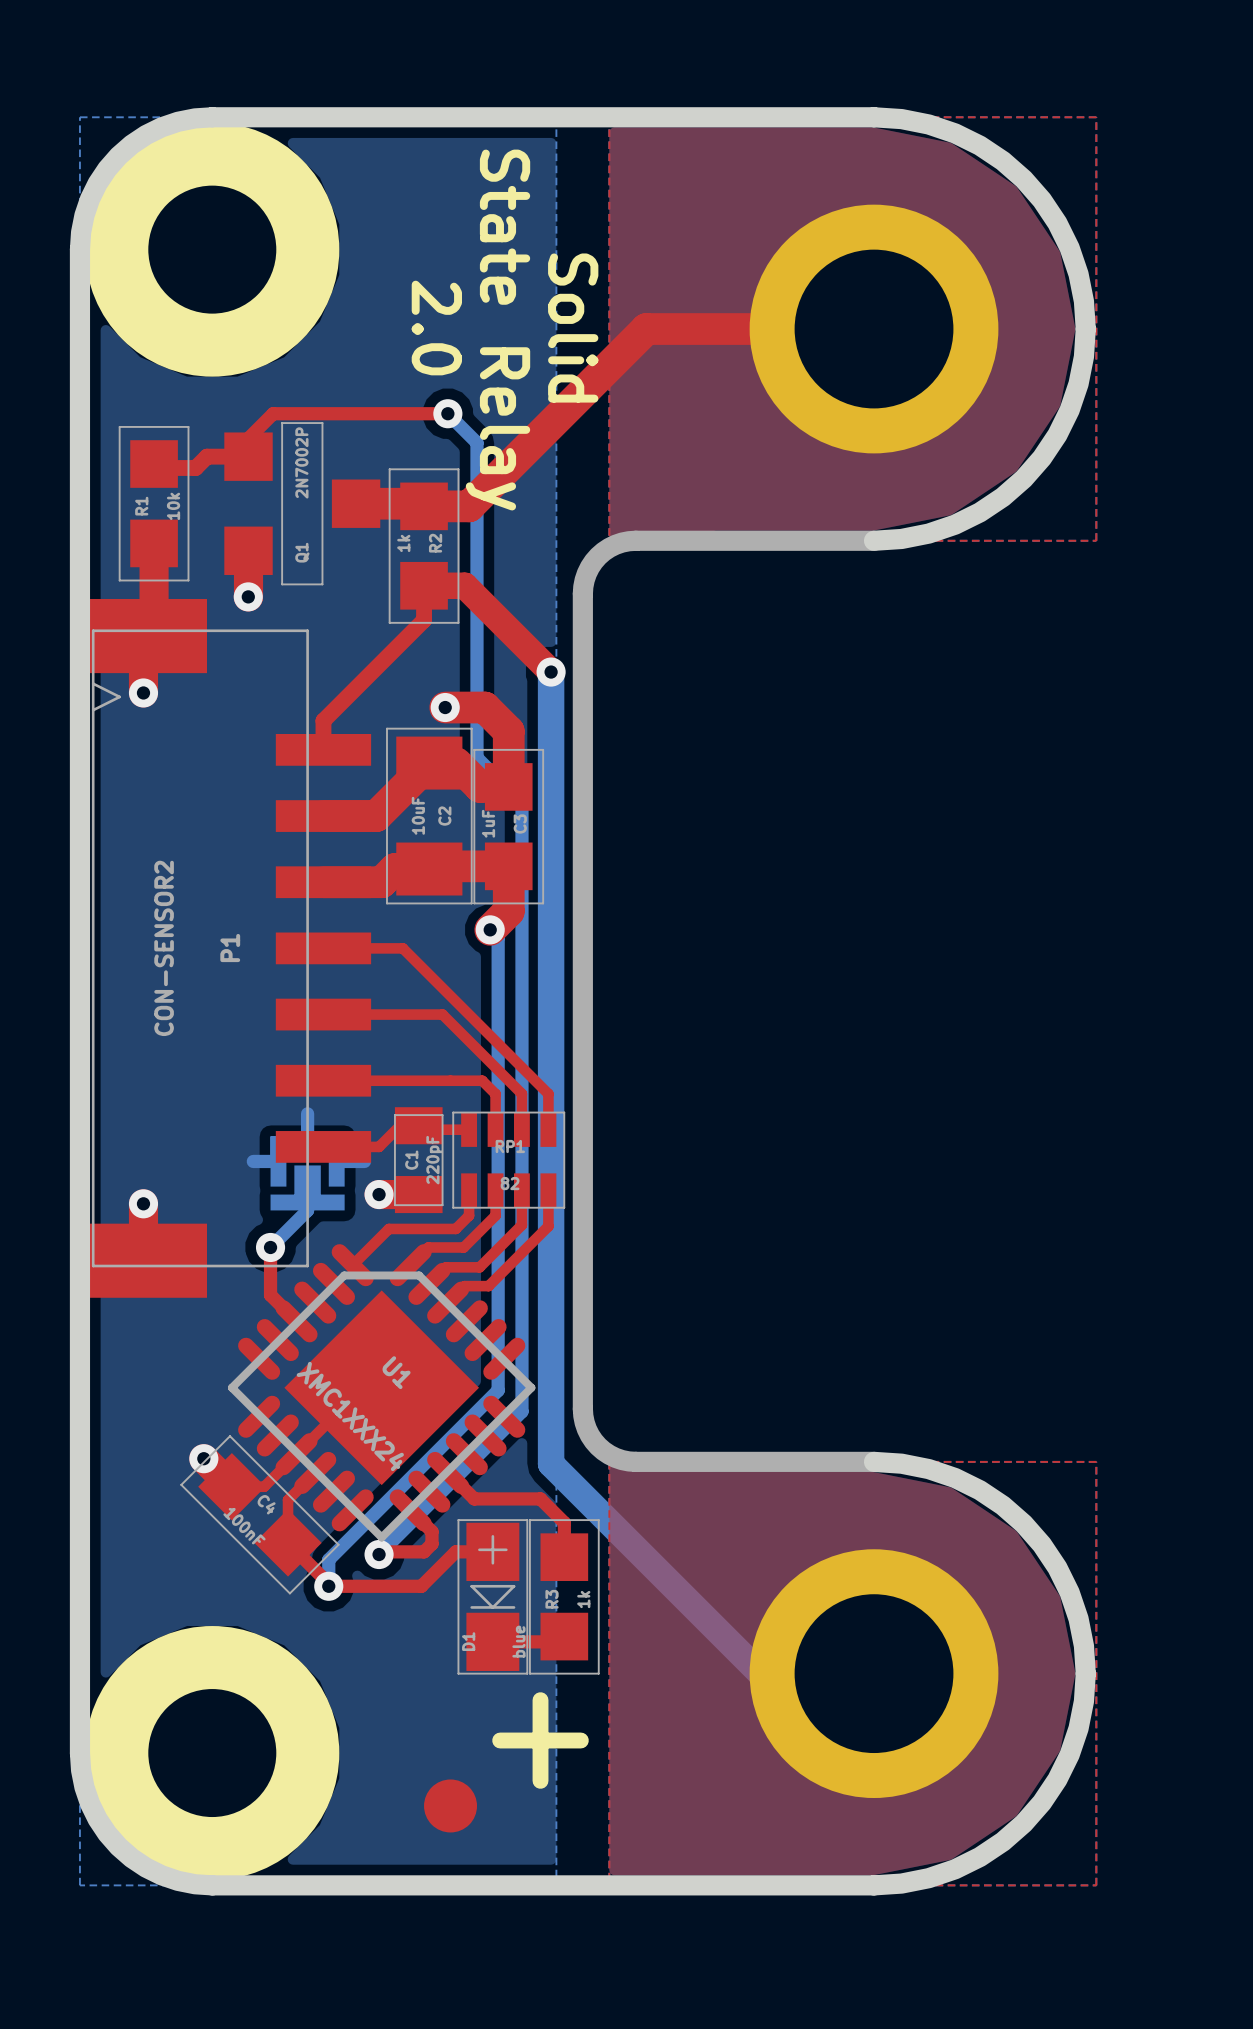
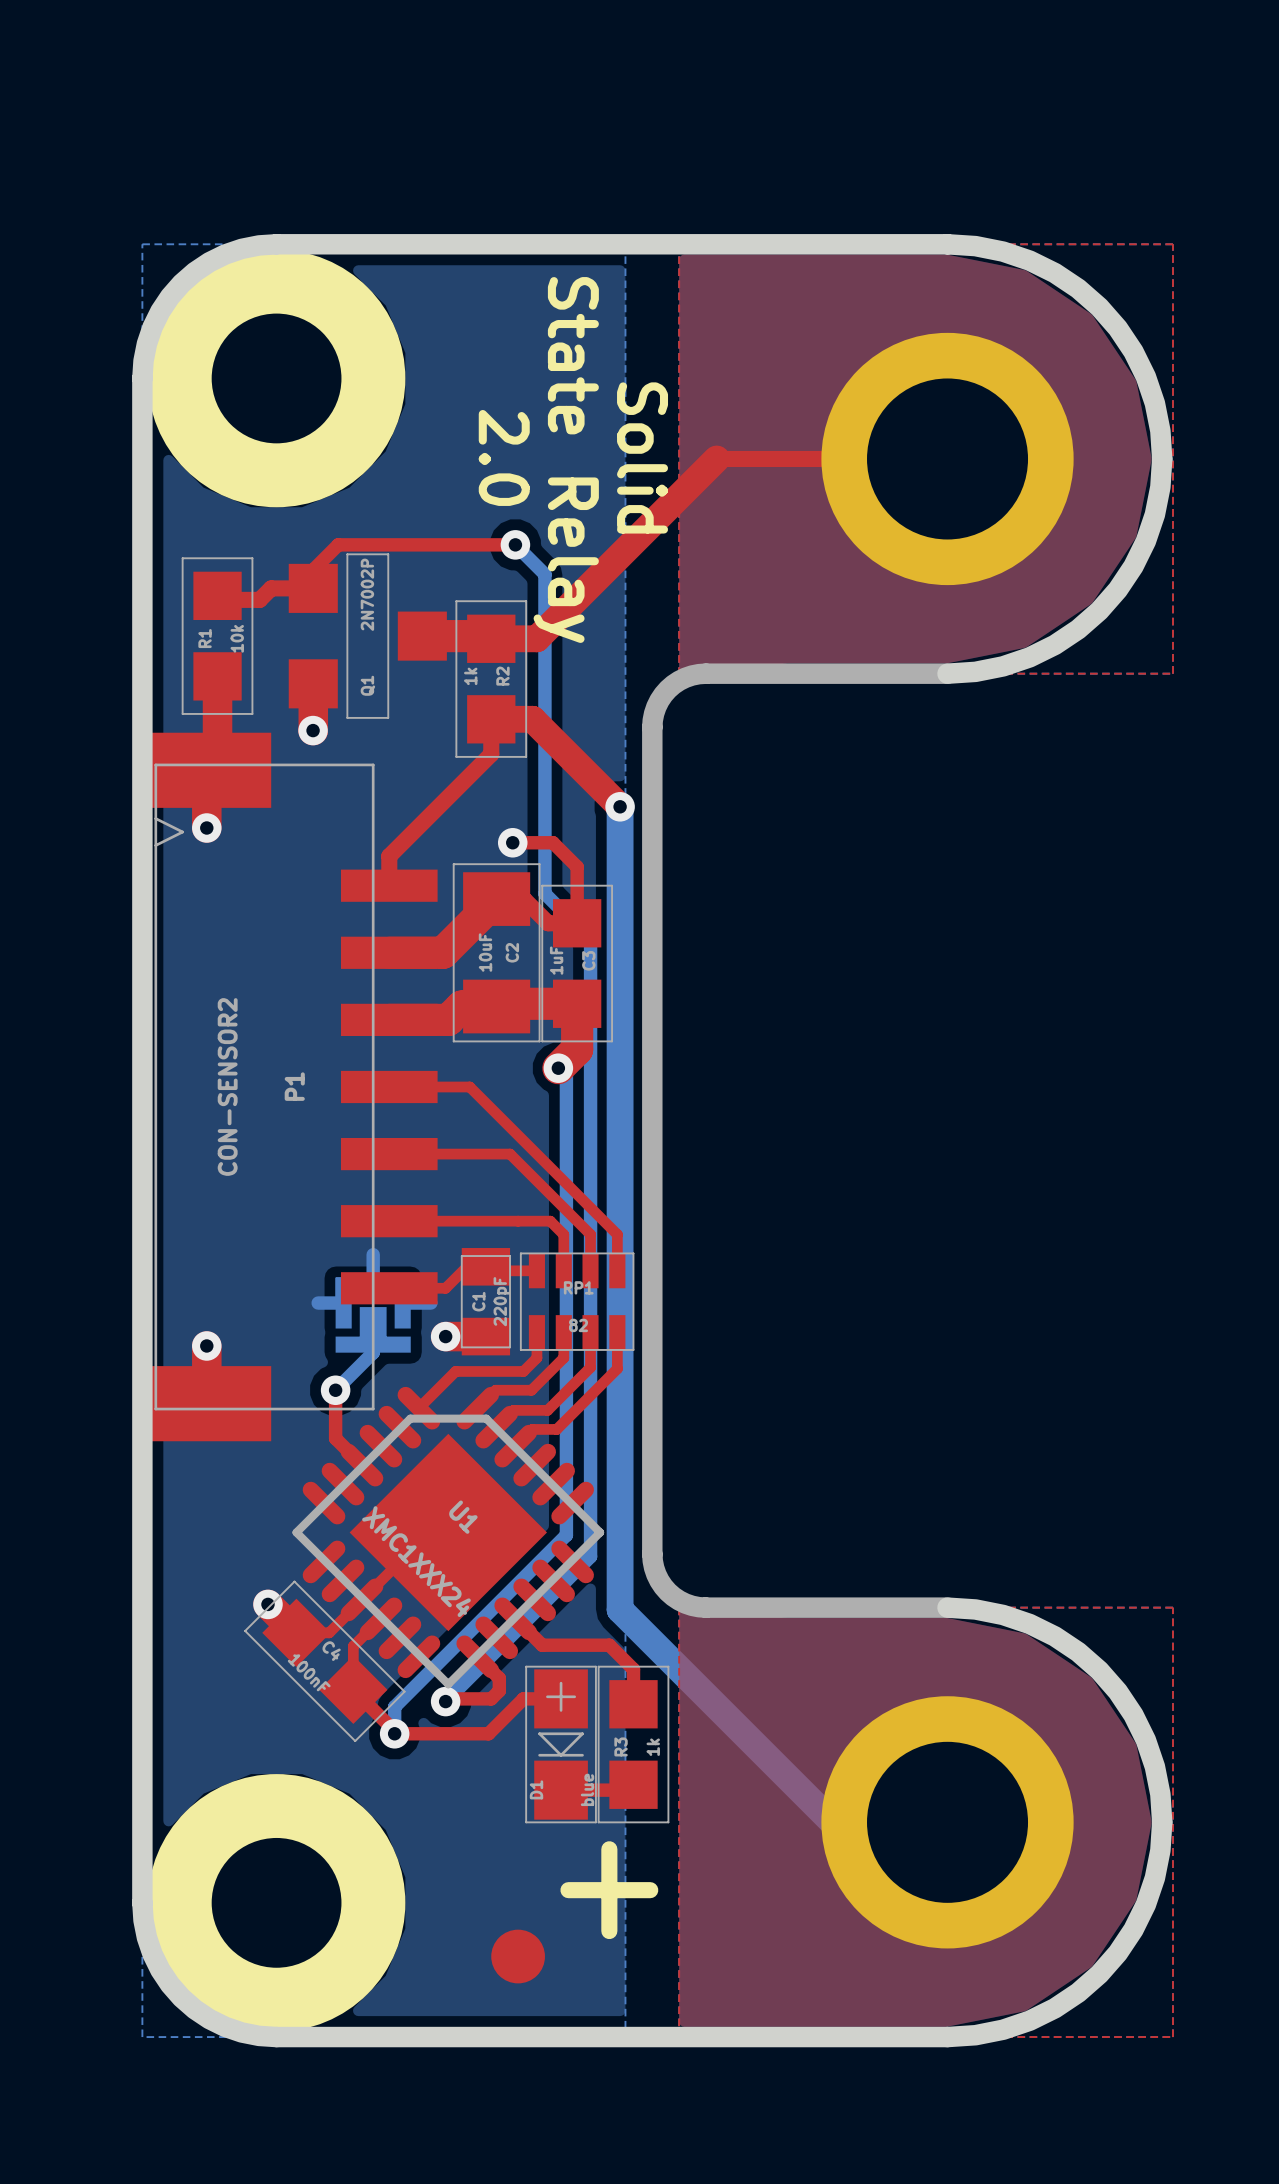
top track width: thick (874, 329) (646, 329) (469, 506) (424, 506) -> thin (947, 458) (716, 458) (536, 638) (491, 638)
top track width: thick (445, 707) (484, 707) (508, 731) (508, 786) (480, 786) (456, 763) -> thin (512, 842) (553, 842) (577, 866) (577, 923) (548, 923) (523, 899)

